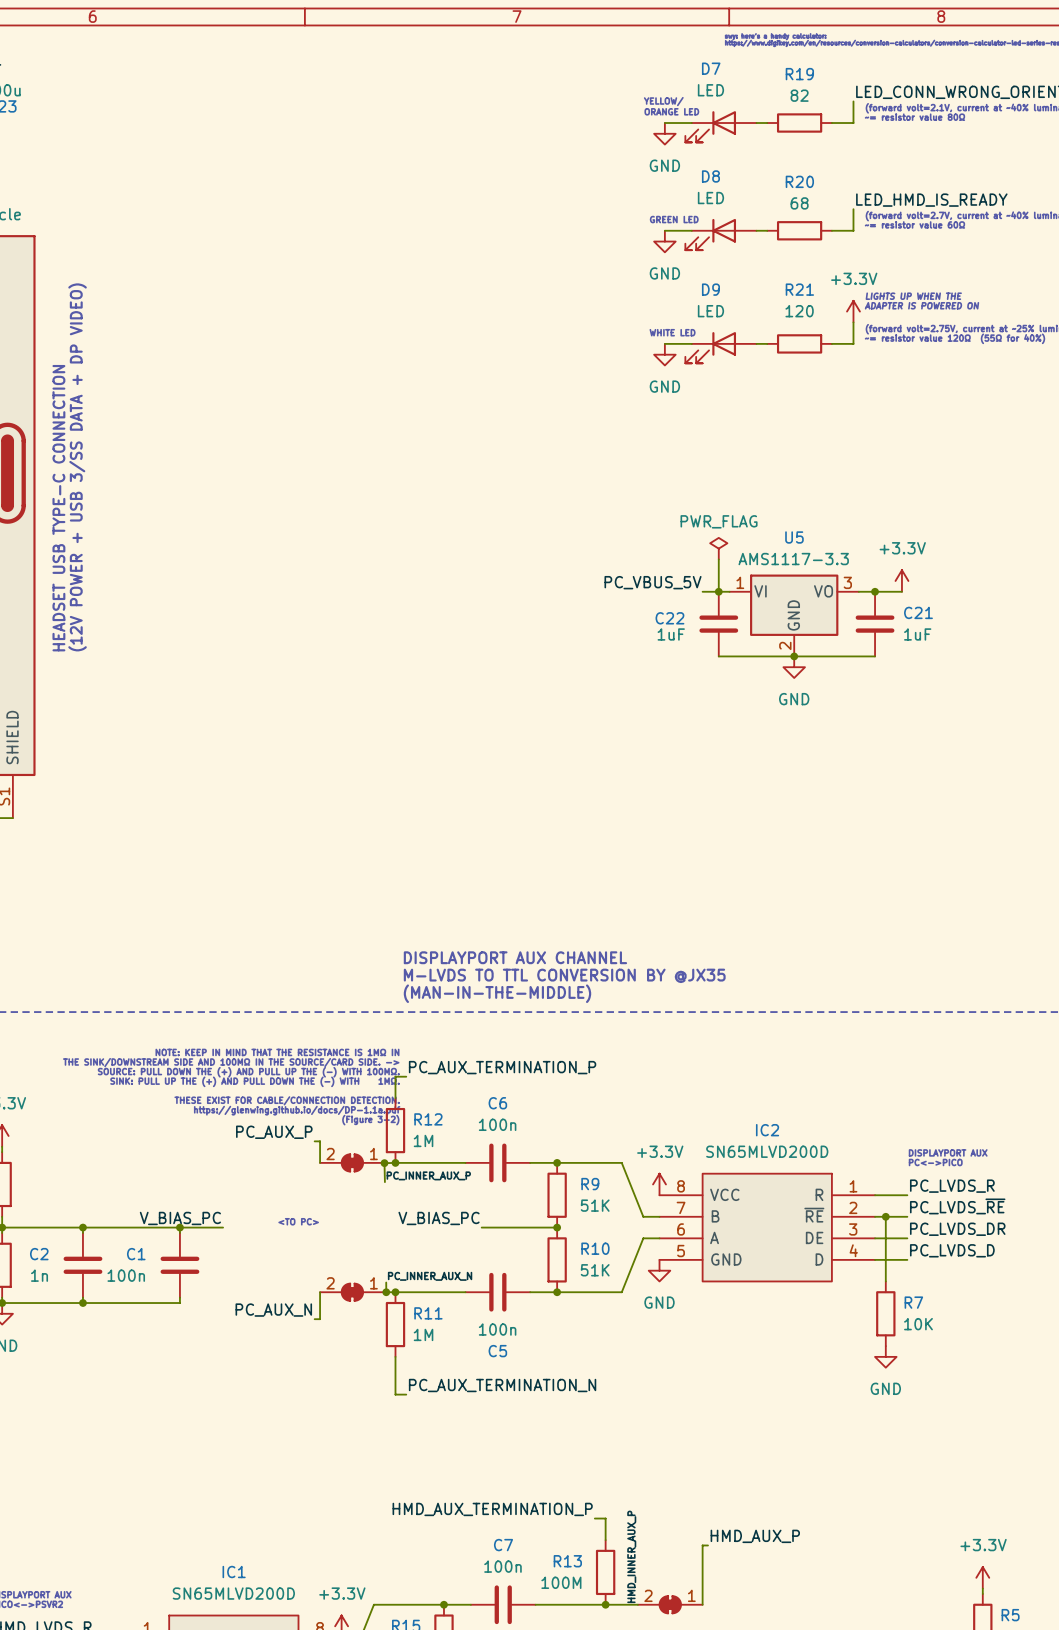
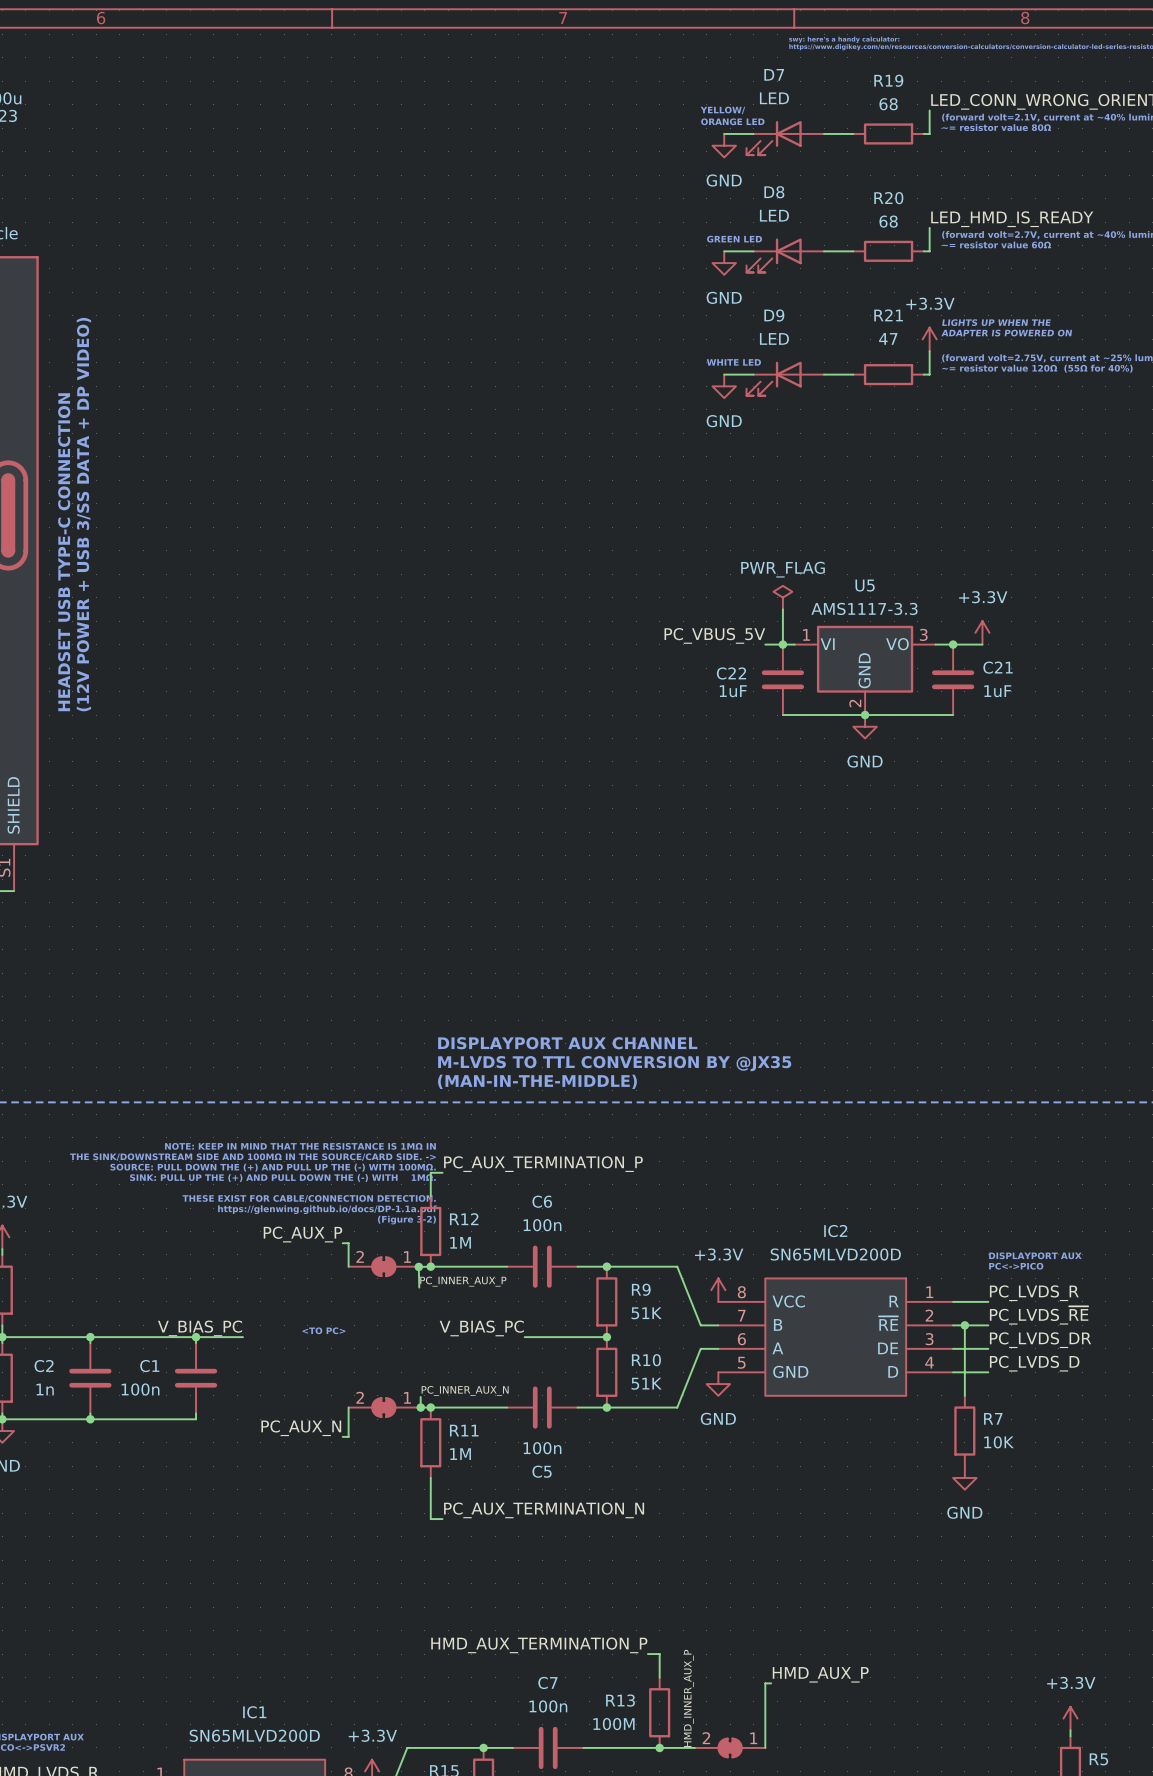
R19 value: 82 (799, 95) -> 68 (888, 104)
R19 position: (799, 123) -> (888, 133)
R20 position: (799, 230) -> (888, 251)
R21 value: 120 (799, 311) -> 47 (888, 338)
R21 position: (799, 343) -> (888, 374)

